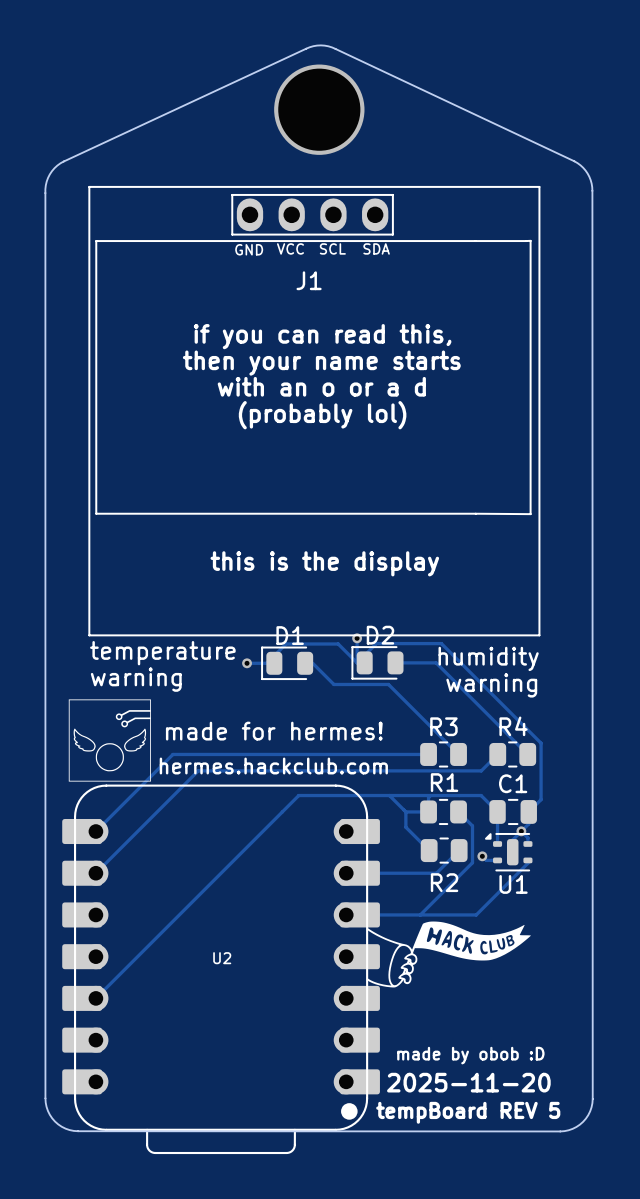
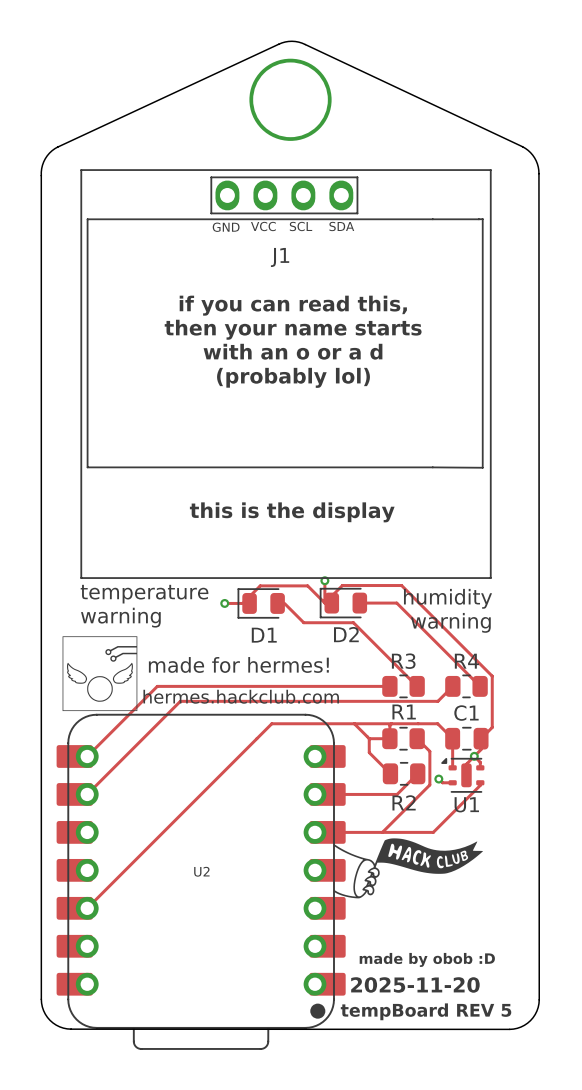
D1 name position: D1 (290, 635) -> D1 (264, 635)
D2 name position: D2 (380, 635) -> D2 (346, 634)

